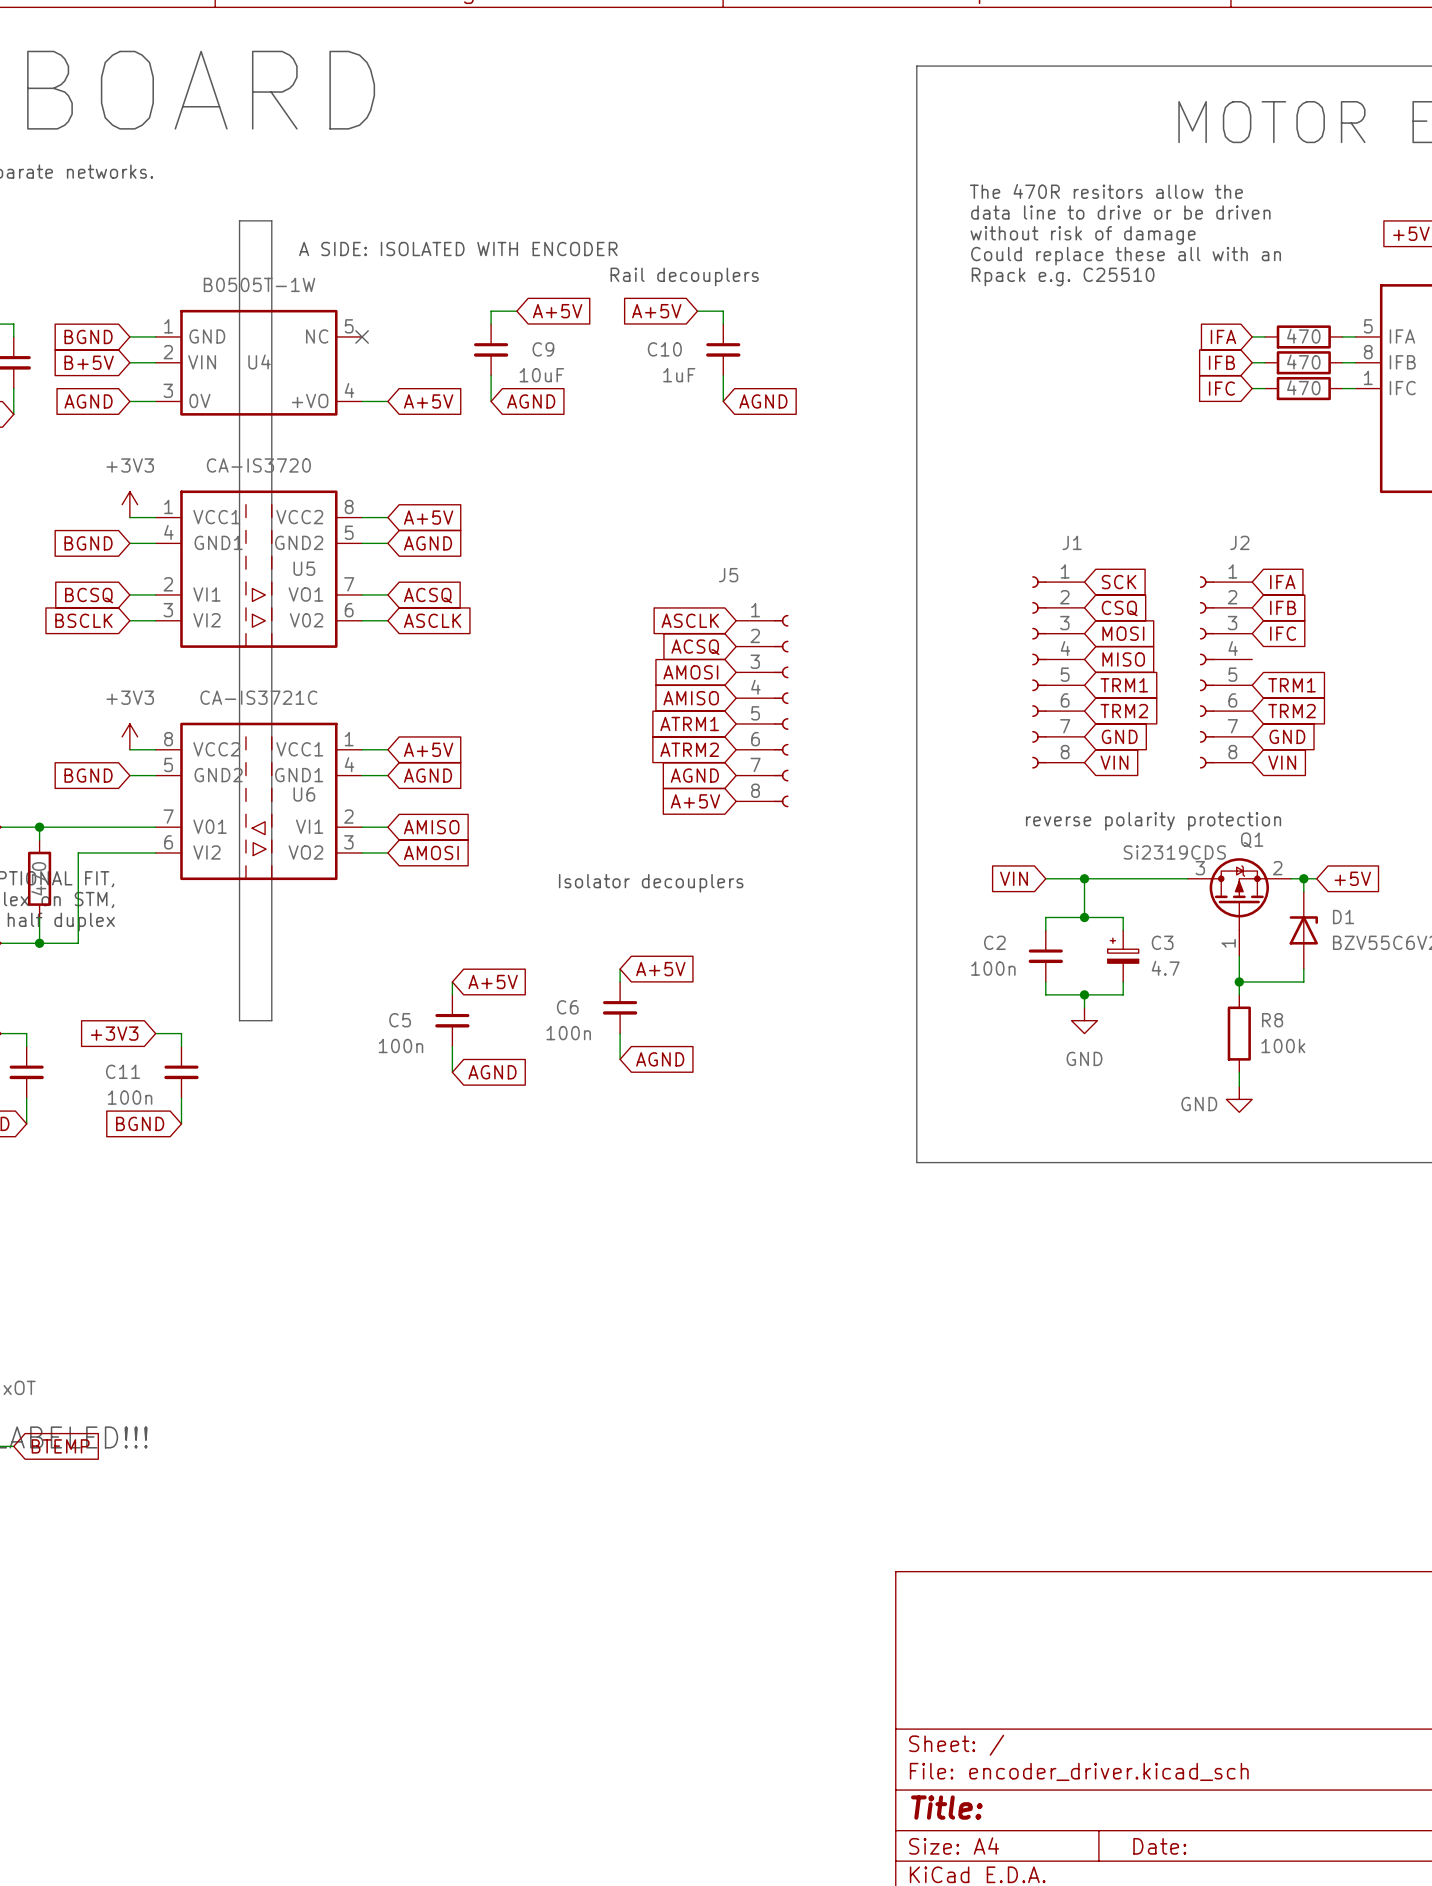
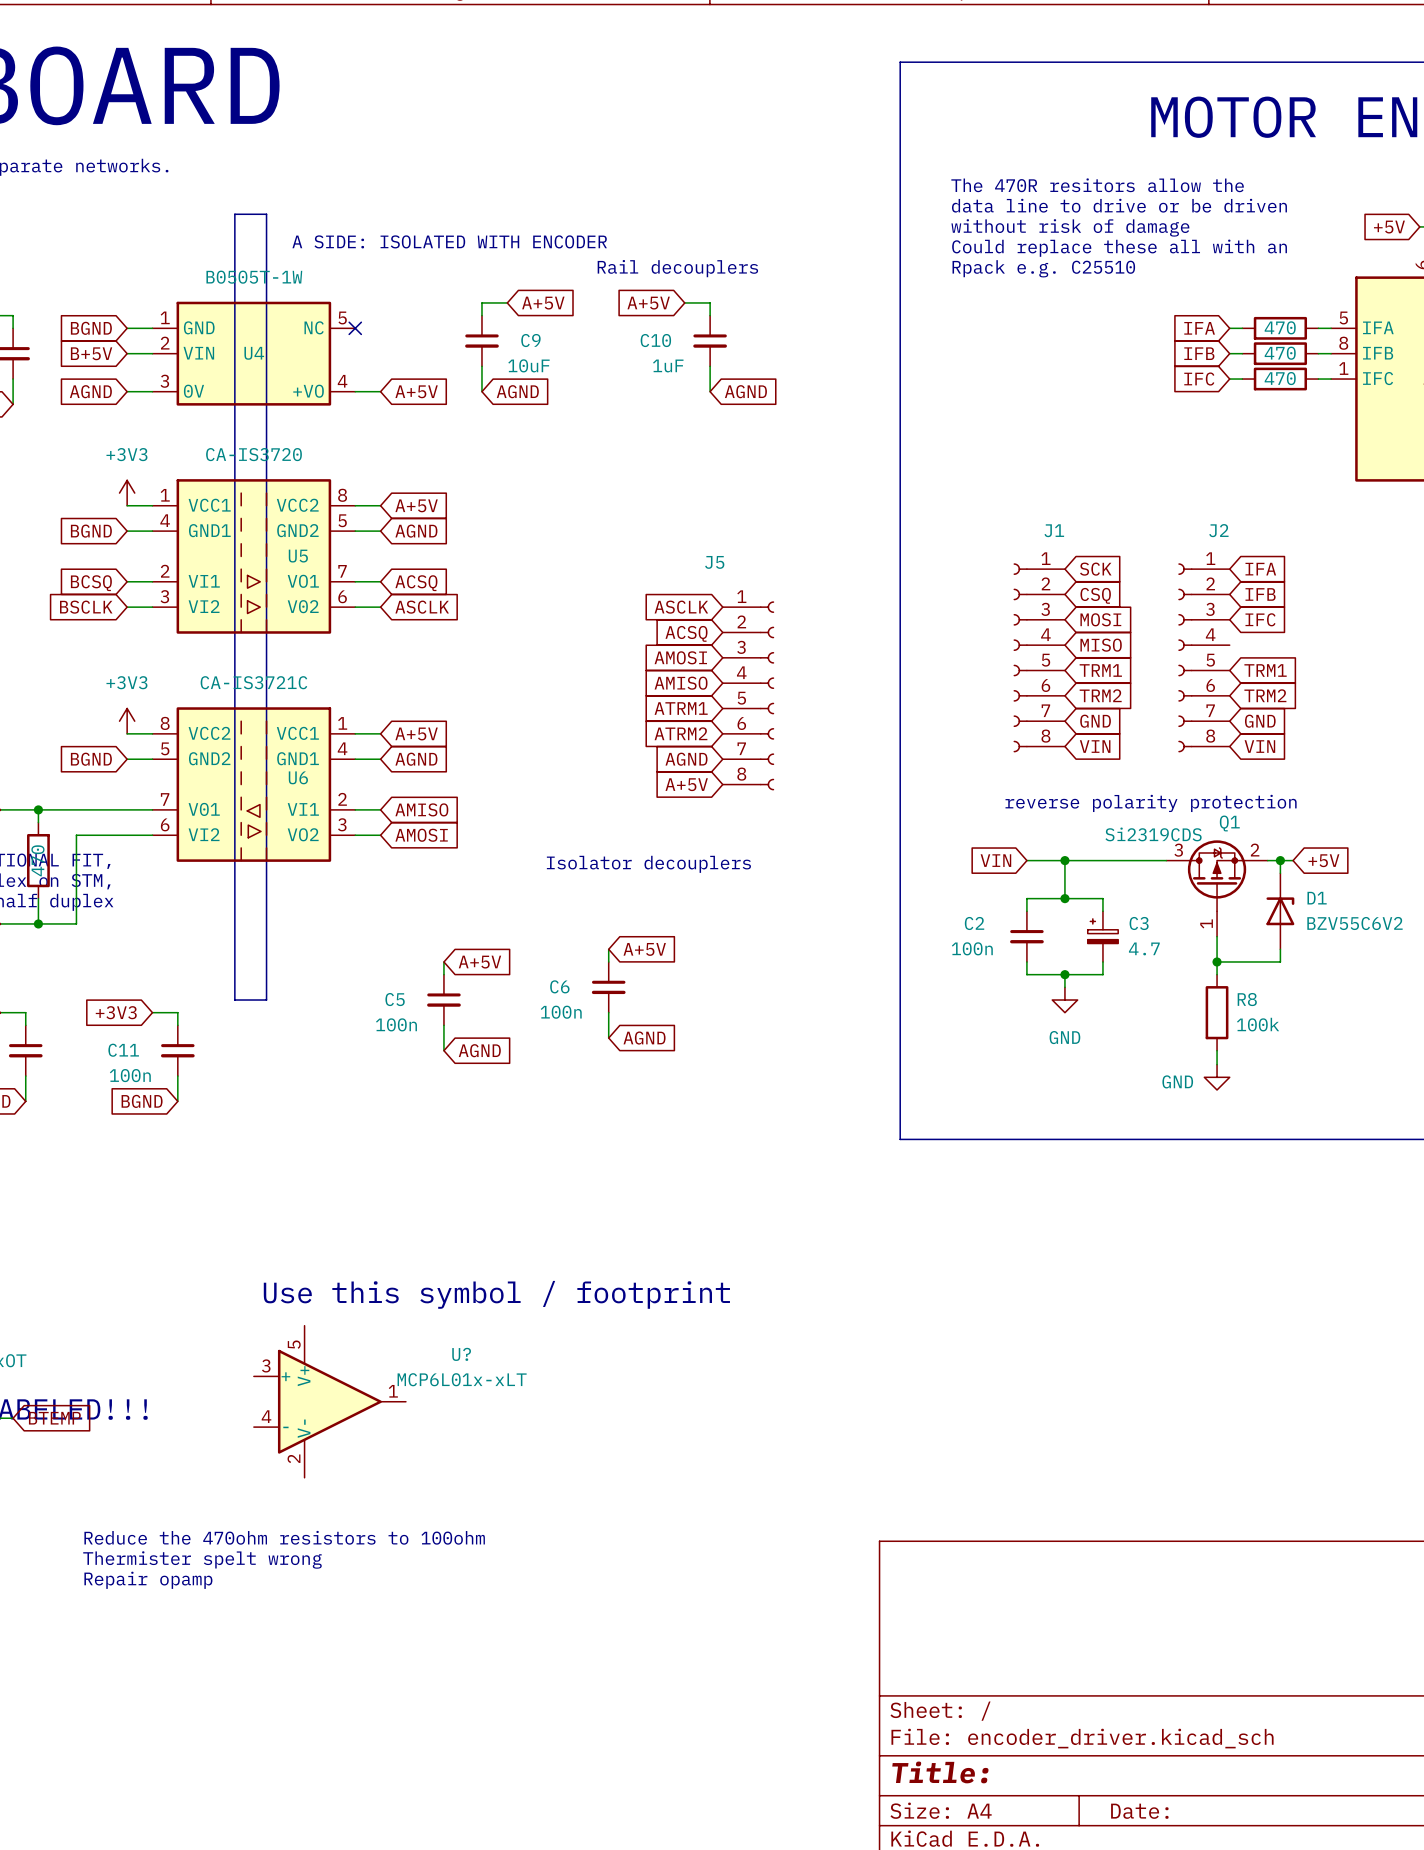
text: none -> Use this symbol / footprint (496, 1294)
U?: none -> MCP6L01x-xLT (329, 1401)
text: none -> Reduce the 470ohm resistors to 100ohm (284, 1537)
text: none -> Thermister spelt wrong (202, 1559)
text: none -> Repair opamp (148, 1580)

